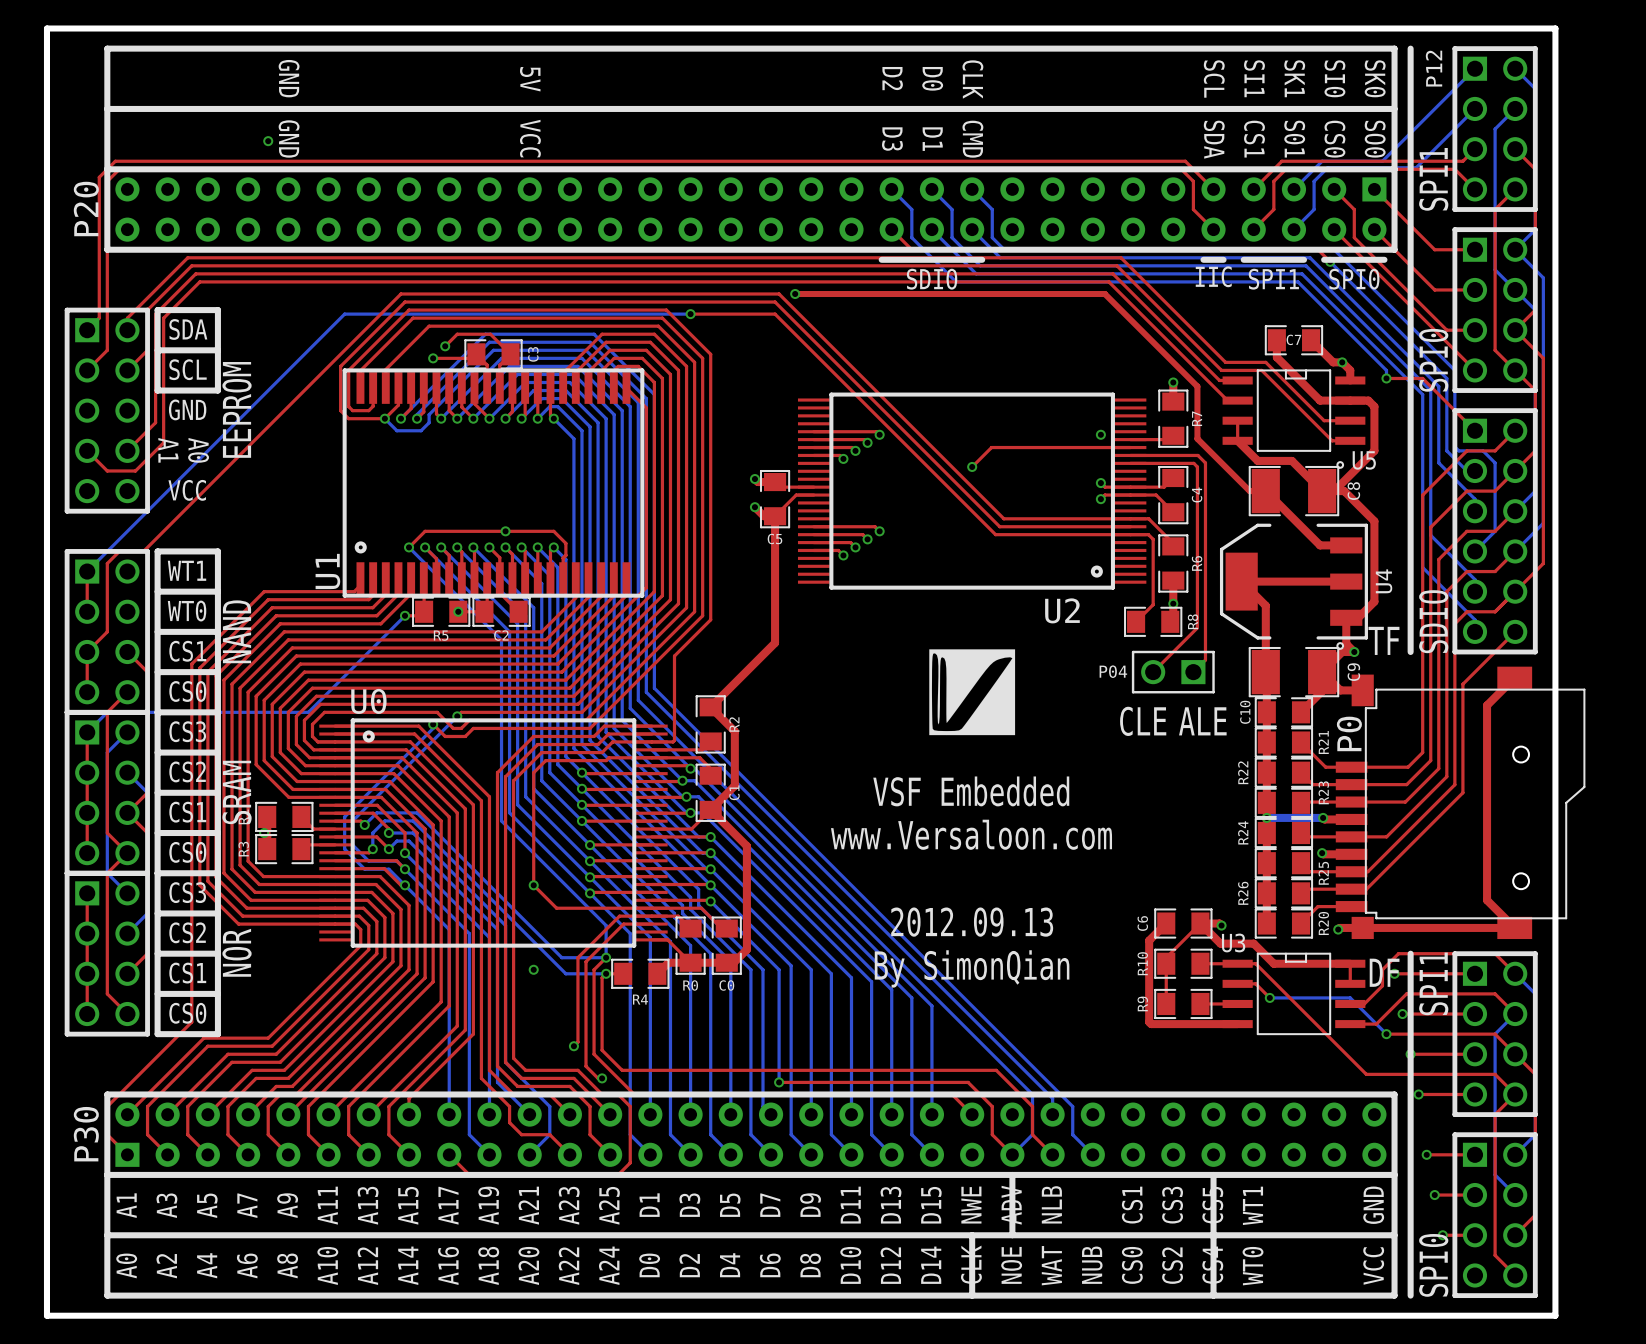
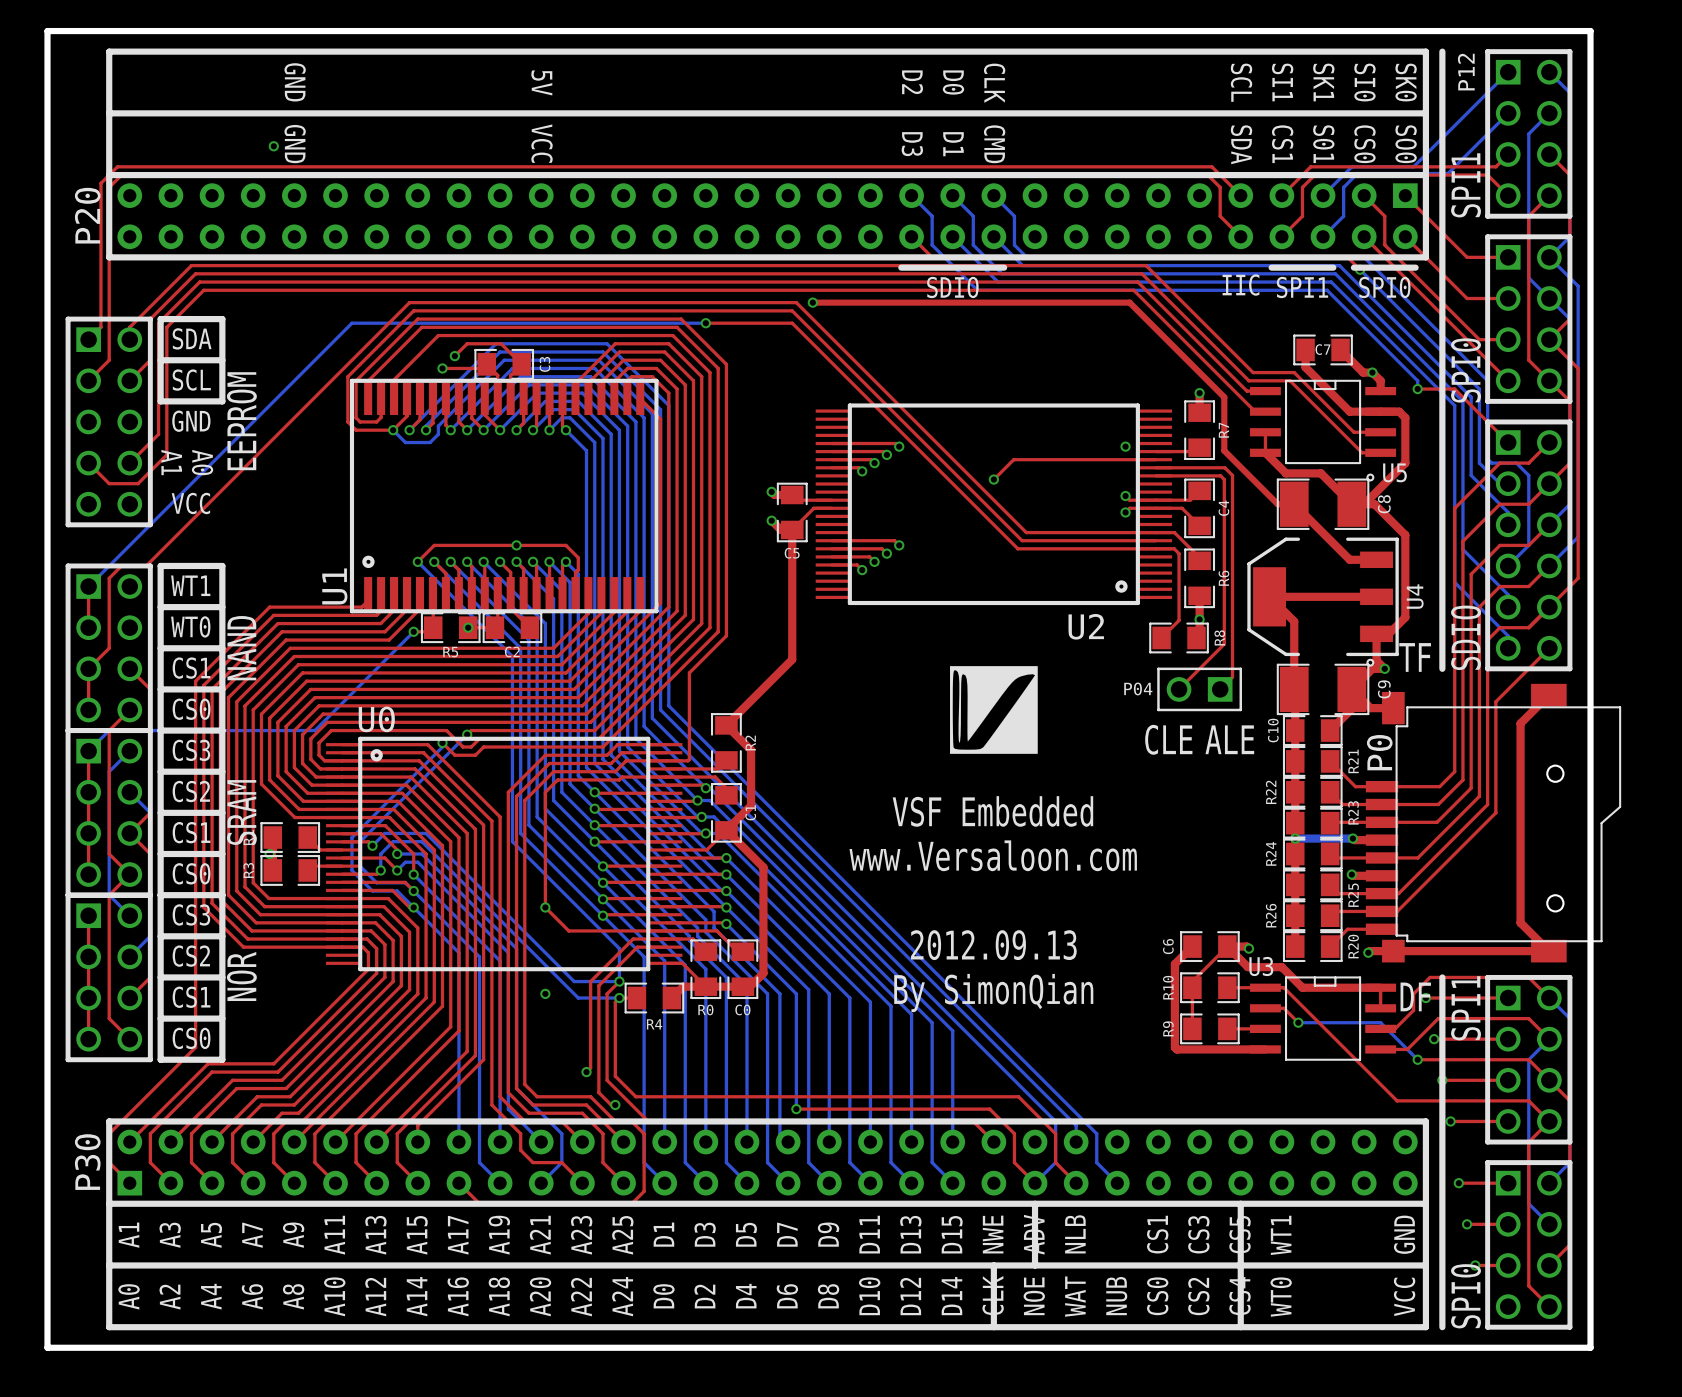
line: (1203, 259) (1223, 259) -> none

